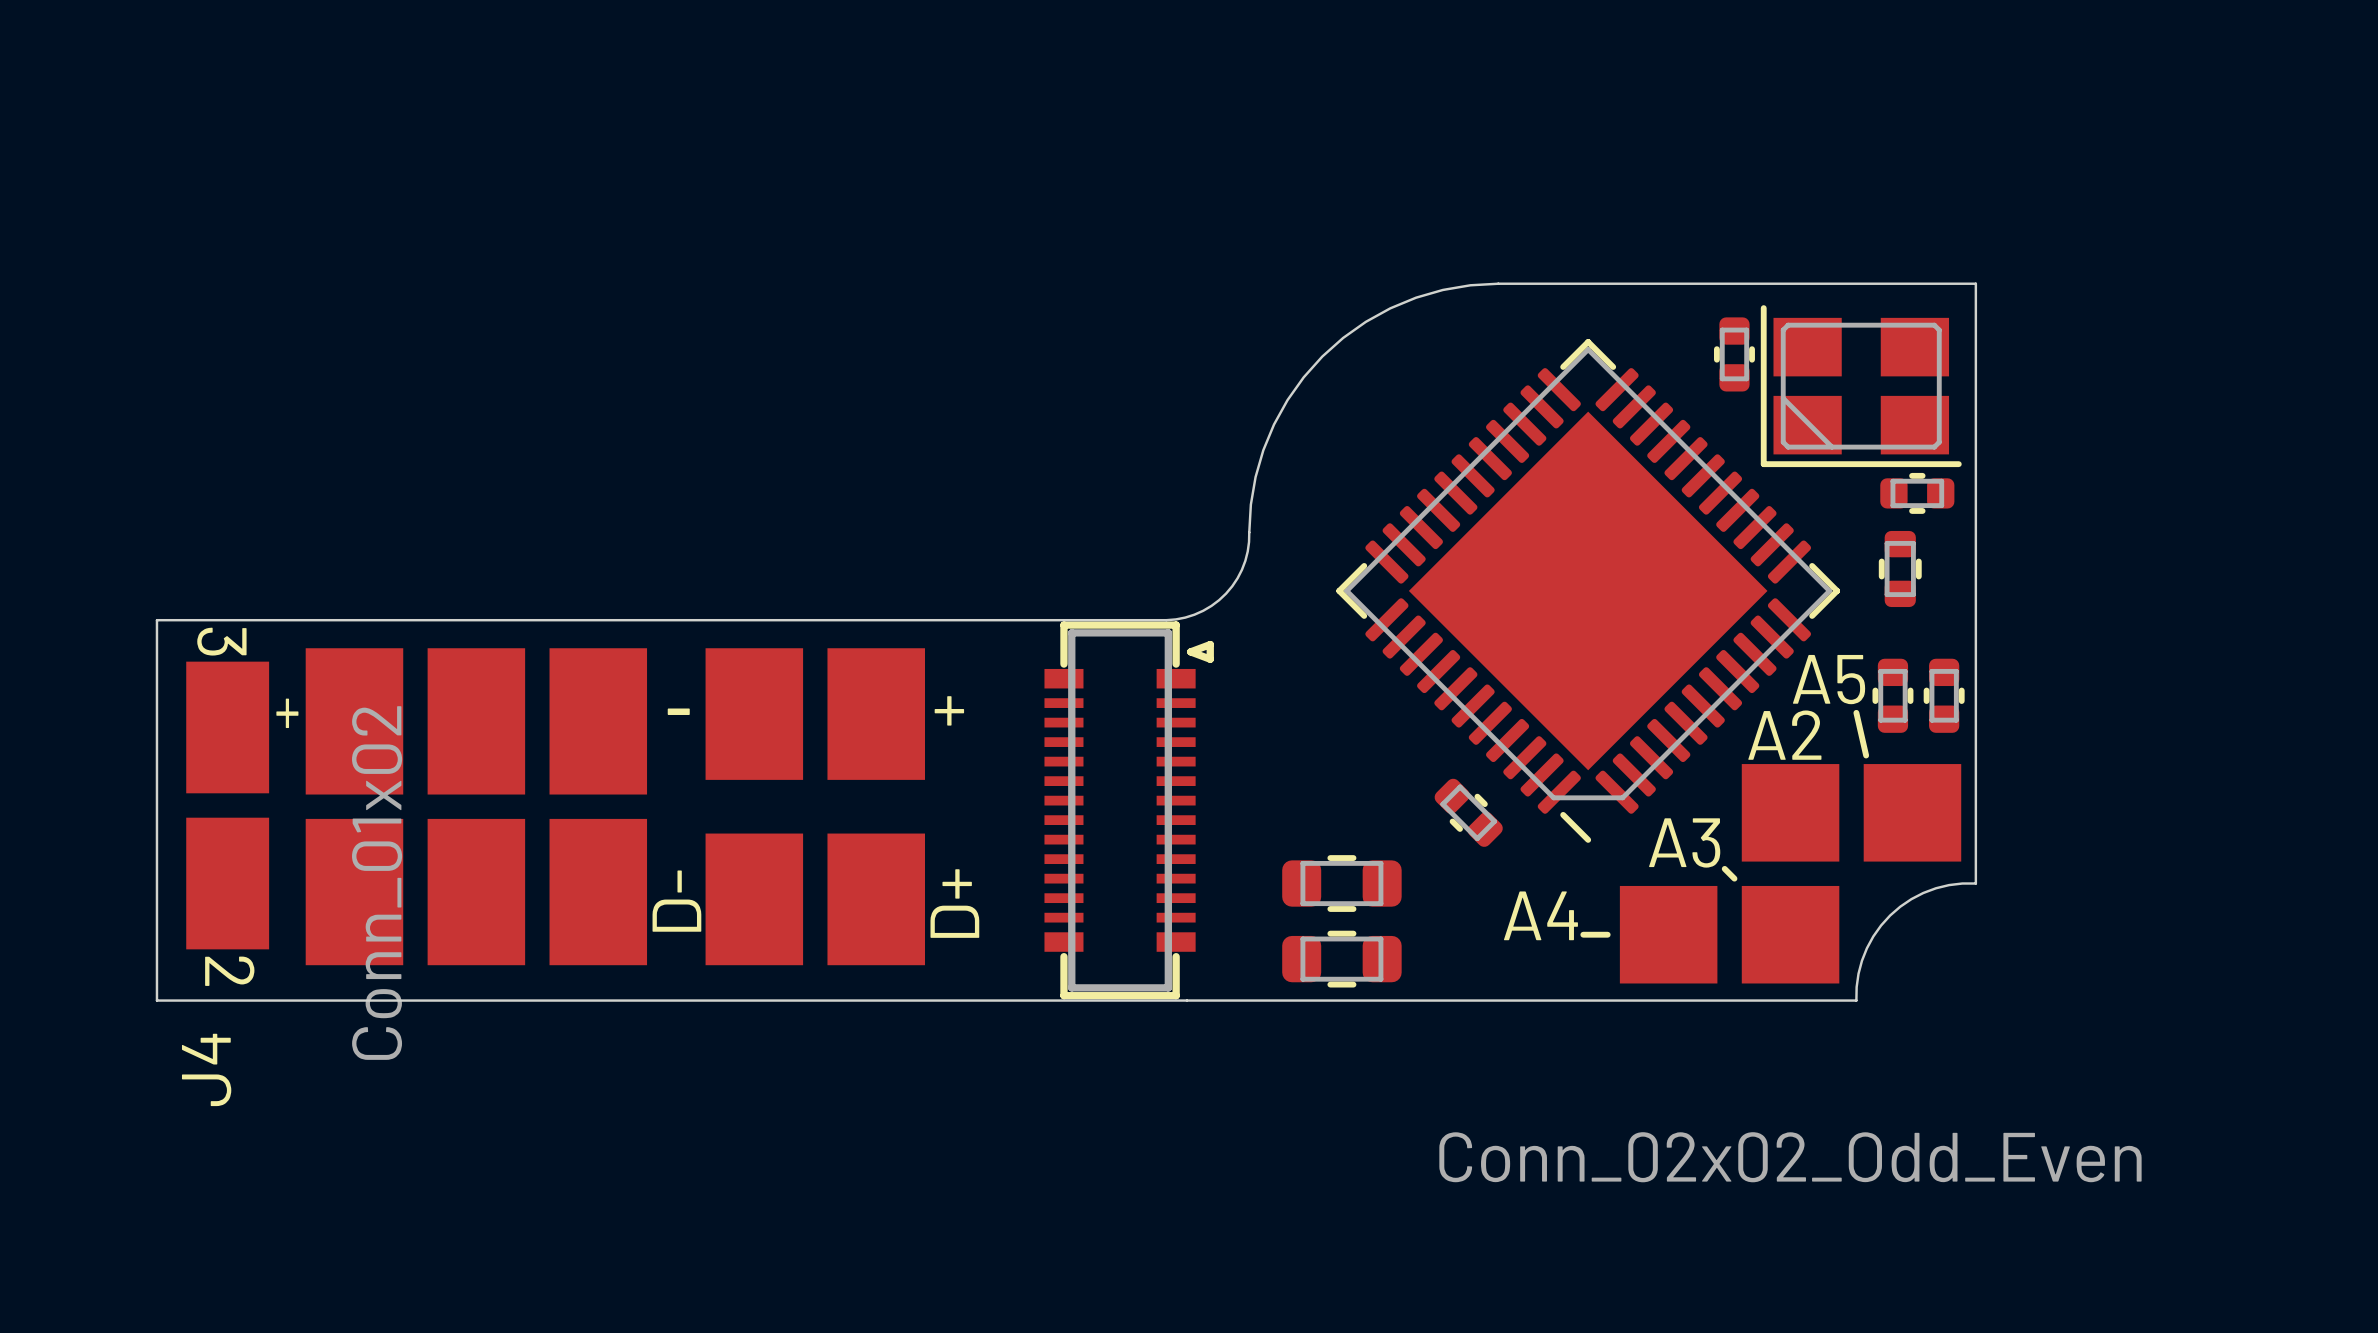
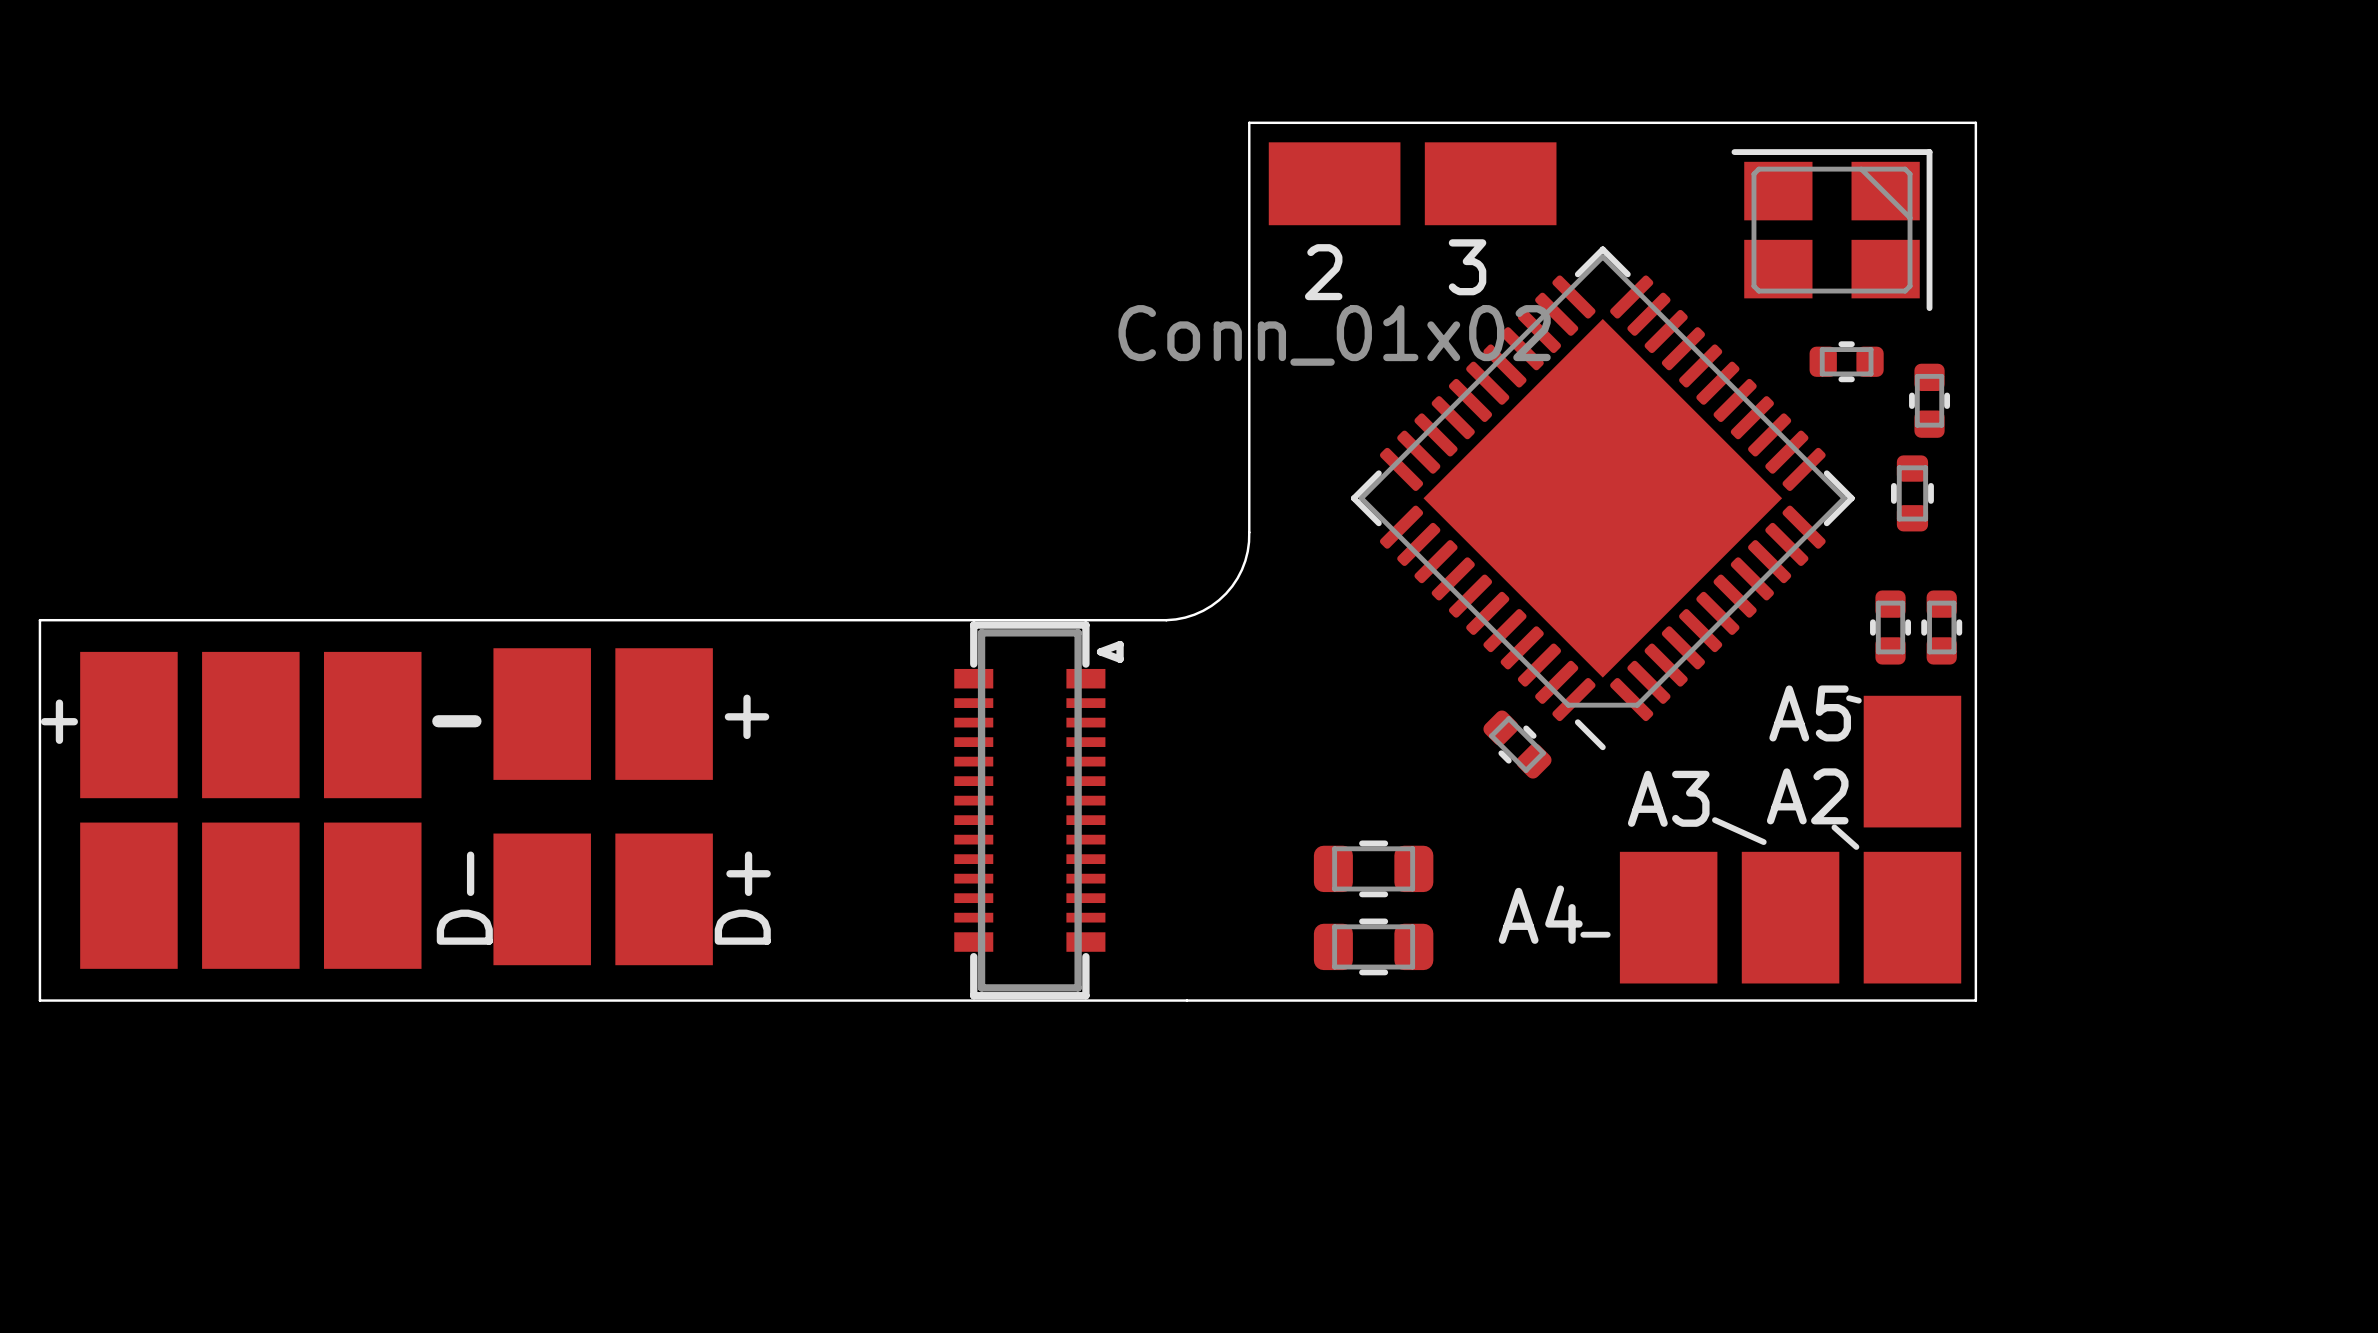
part: none -> Conn_01x02 (1412, 183)
part: none -> (1832, 230)
text: none -> 3 (1467, 267)
text: none -> 2 (1323, 272)
board edge: (1975, 283) (1498, 283) (1470, 285) (1442, 289) (1416, 297) (1390, 308) (1365, 321) (1343, 337) (1322, 356) (1303, 377) (1287, 400) (1274, 424) (1263, 450) (1255, 477) (1250, 504) (1249, 532) -> (1975, 283) (1975, 122) (1249, 122) (1249, 532)
part footprint: [1760, 305, 1962, 468] -> [1809, 341, 1884, 383]
part: (1734, 354) -> none
part: none -> (1929, 400)
part footprint: [1880, 472, 1955, 514] -> [1891, 455, 1934, 532]
part: (1900, 568) -> none
part position: (1588, 590) -> (1602, 498)
board edge: (156, 620) (156, 1000) -> (156, 620) (39, 620) (39, 1000) (156, 1000)
part: none -> (1890, 627)
part: none -> (1941, 627)
text: 3 (221, 641) -> none
text position: A5 (1828, 679) -> A5 (1810, 713)
part: (1892, 695) -> none
part: (1944, 695) -> none
line: none -> (1849, 698) (1858, 700)
text position: + (949, 710) -> + (747, 716)
text position: - (678, 711) -> - (456, 721)
line: (1856, 712) (1866, 755) -> none
text position: + (287, 713) -> + (59, 721)
text position: A2 (1784, 735) -> A2 (1807, 796)
part footprint: [1619, 764, 1962, 984] -> [1619, 695, 1962, 984]
J4: Conn_01x02 (227, 805) -> none
part position: (476, 806) -> (250, 810)
part position: (815, 806) -> (603, 806)
part position: (1129, 810) -> (1038, 810)
part position: (1468, 812) -> (1517, 744)
line: none -> (1714, 820) (1763, 842)
line: none -> (1834, 827) (1856, 846)
text position: A3 (1684, 842) -> A3 (1668, 798)
line: (1724, 868) (1734, 878) -> none
part position: (1341, 883) -> (1373, 868)
board edge: (1975, 883) (1949, 885) (1923, 892) (1911, 899) (1890, 915) (1881, 925) (1866, 948) (1858, 973) (1856, 1000) -> (1975, 883) (1975, 1000) (1856, 1000)
text position: D- (676, 901) -> D- (464, 898)
text position: D+ (954, 903) -> D+ (742, 898)
part position: (1341, 959) -> (1373, 946)
text: 2 (229, 971) -> none
part value: Conn_02x02_Odd_Even (1790, 1157) -> none

